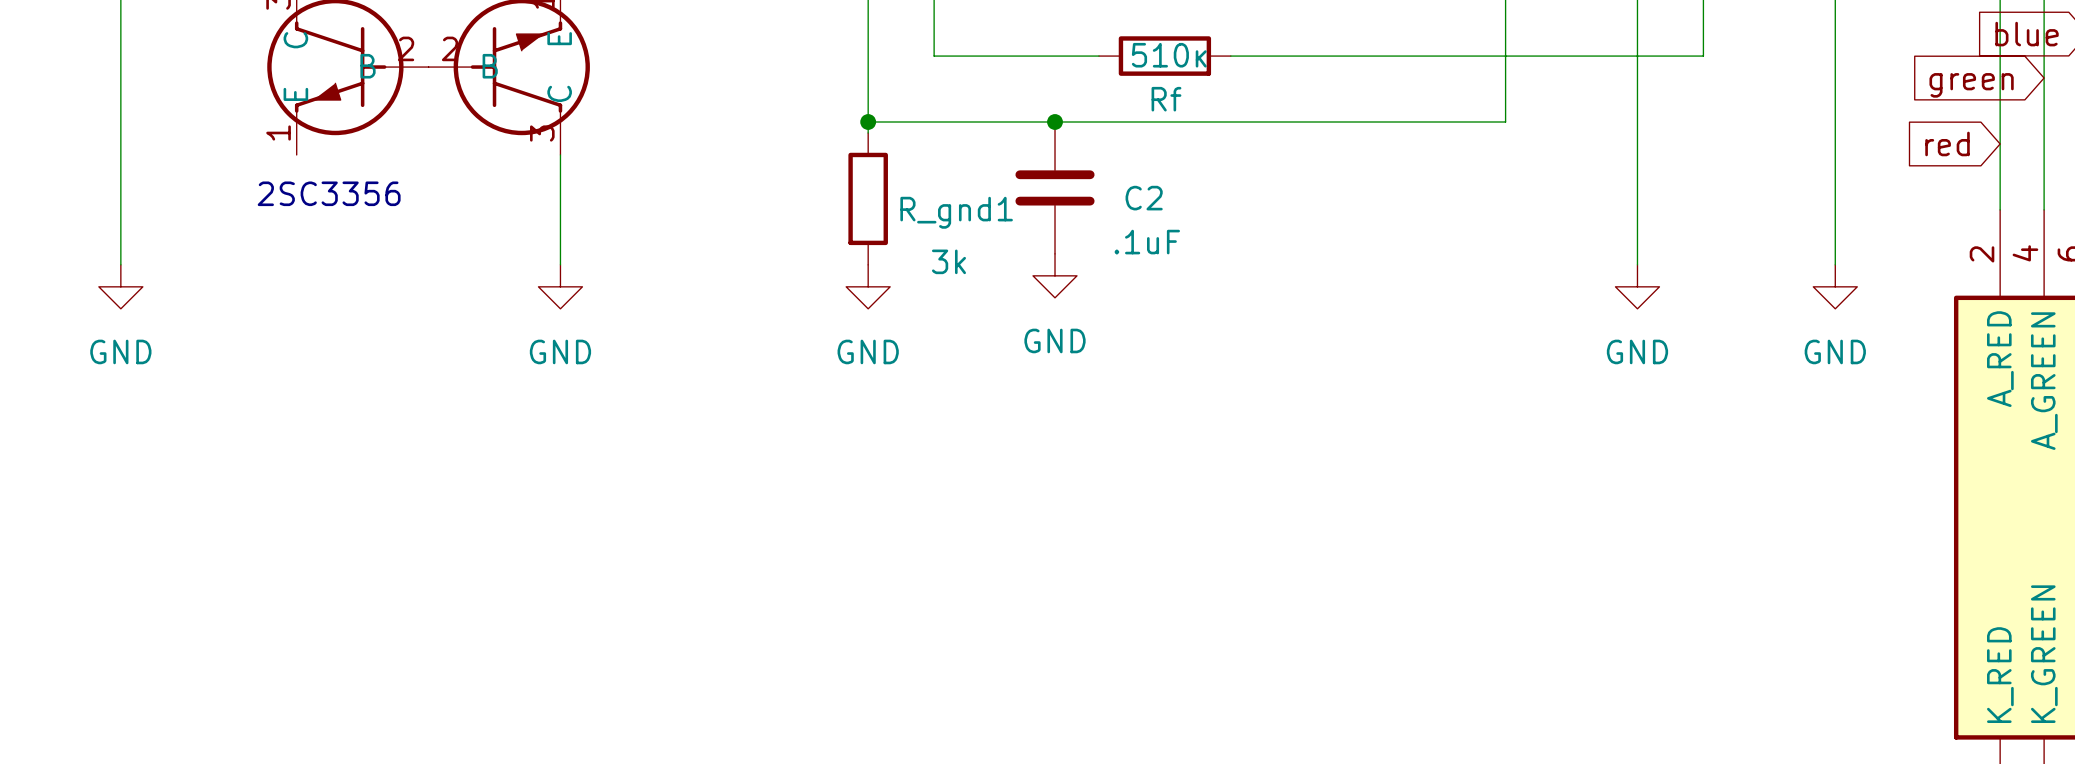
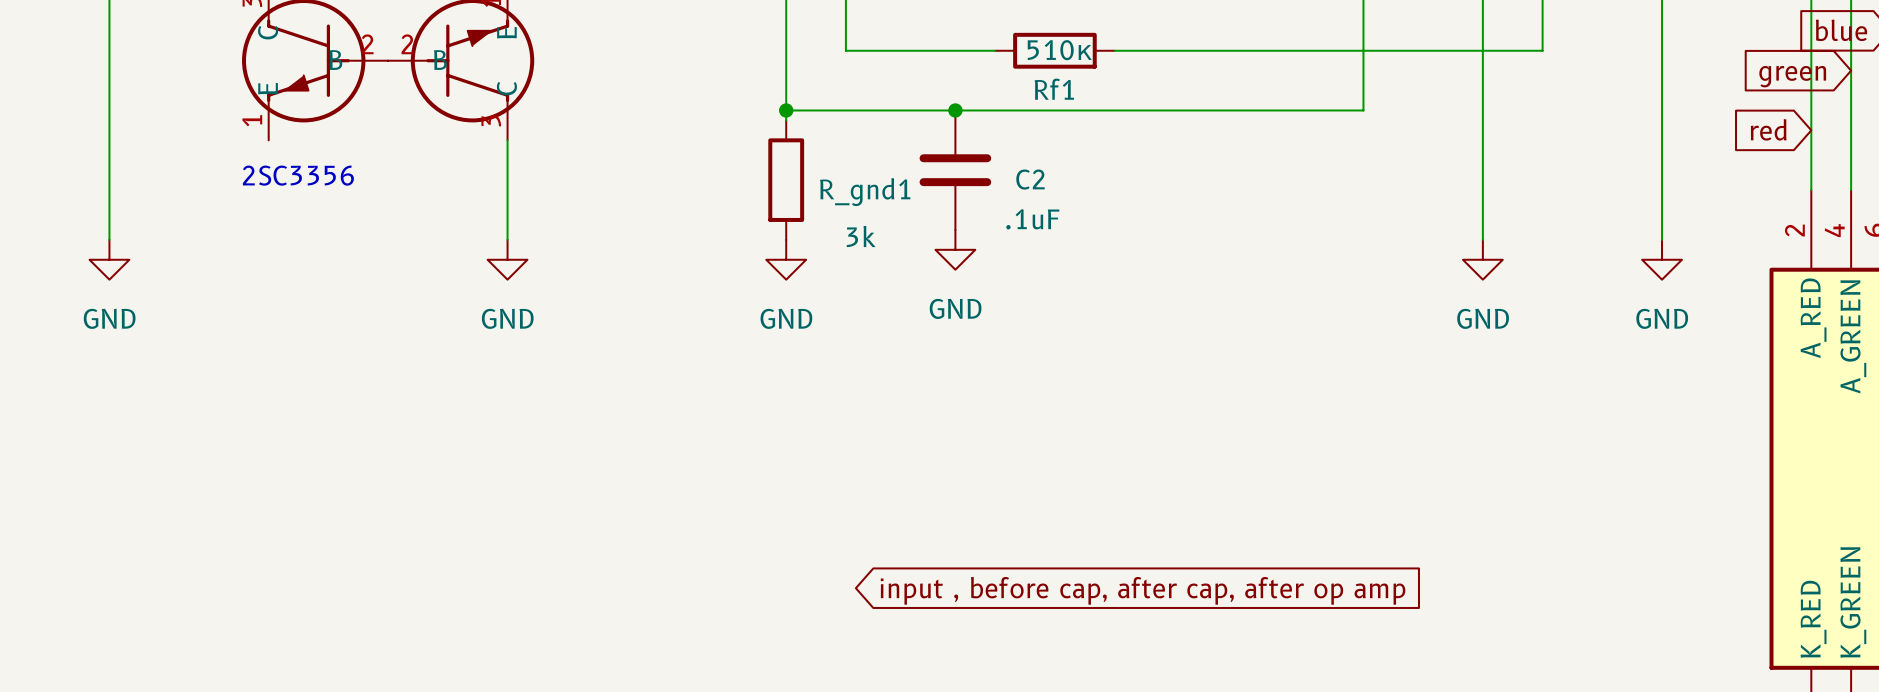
Rf name: Rf (1166, 99) -> Rf1 (1054, 89)
global label: none -> input , before cap, after cap, after op amp (1143, 590)

